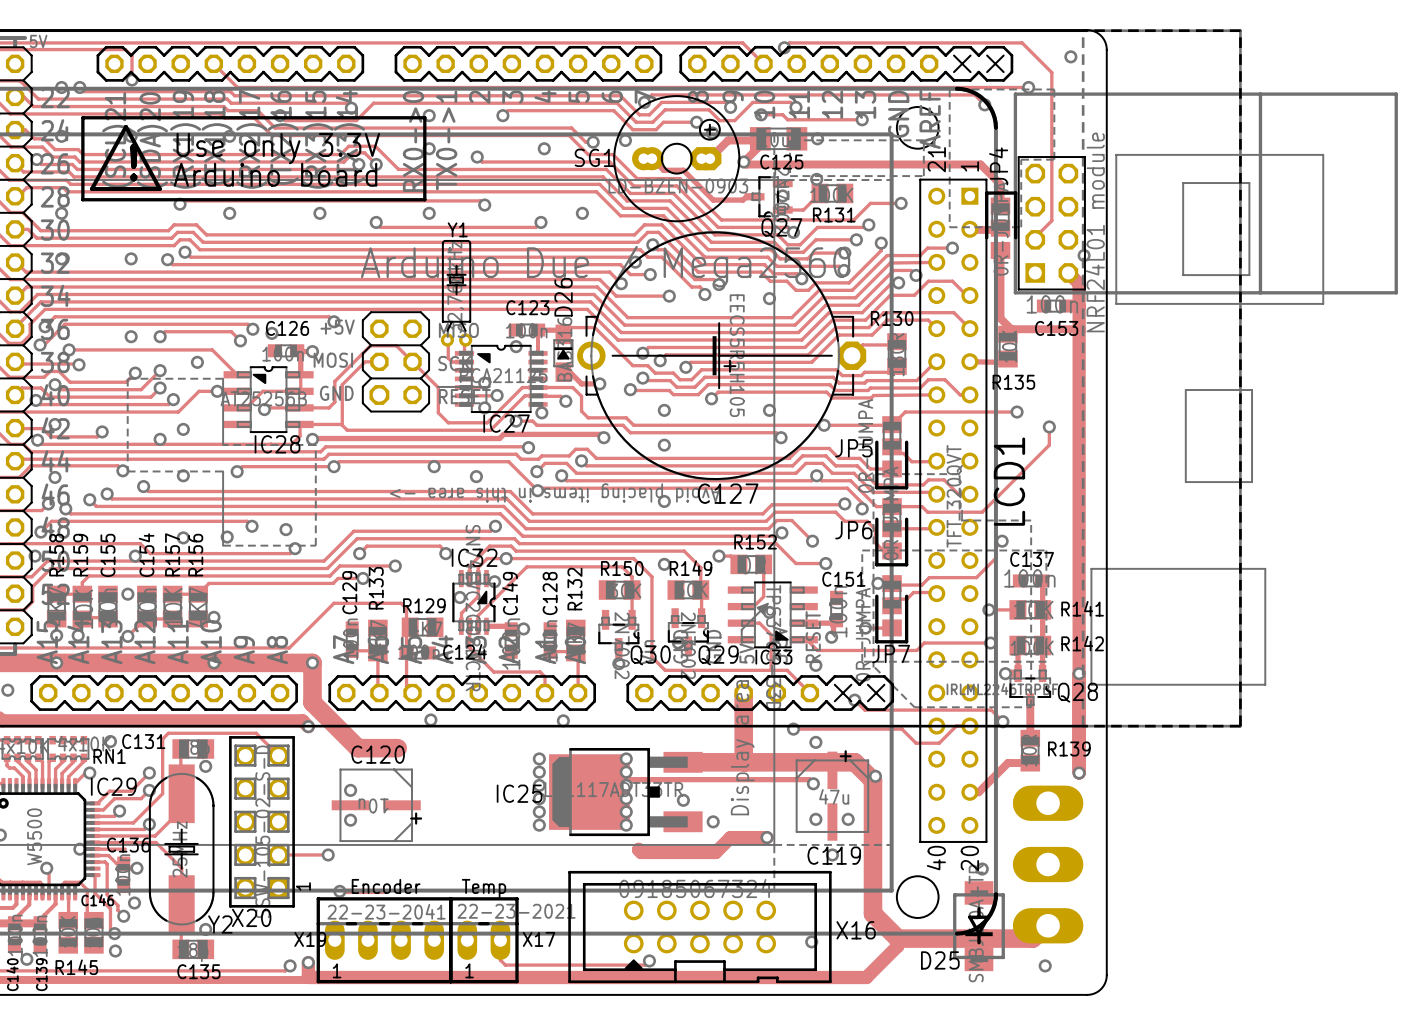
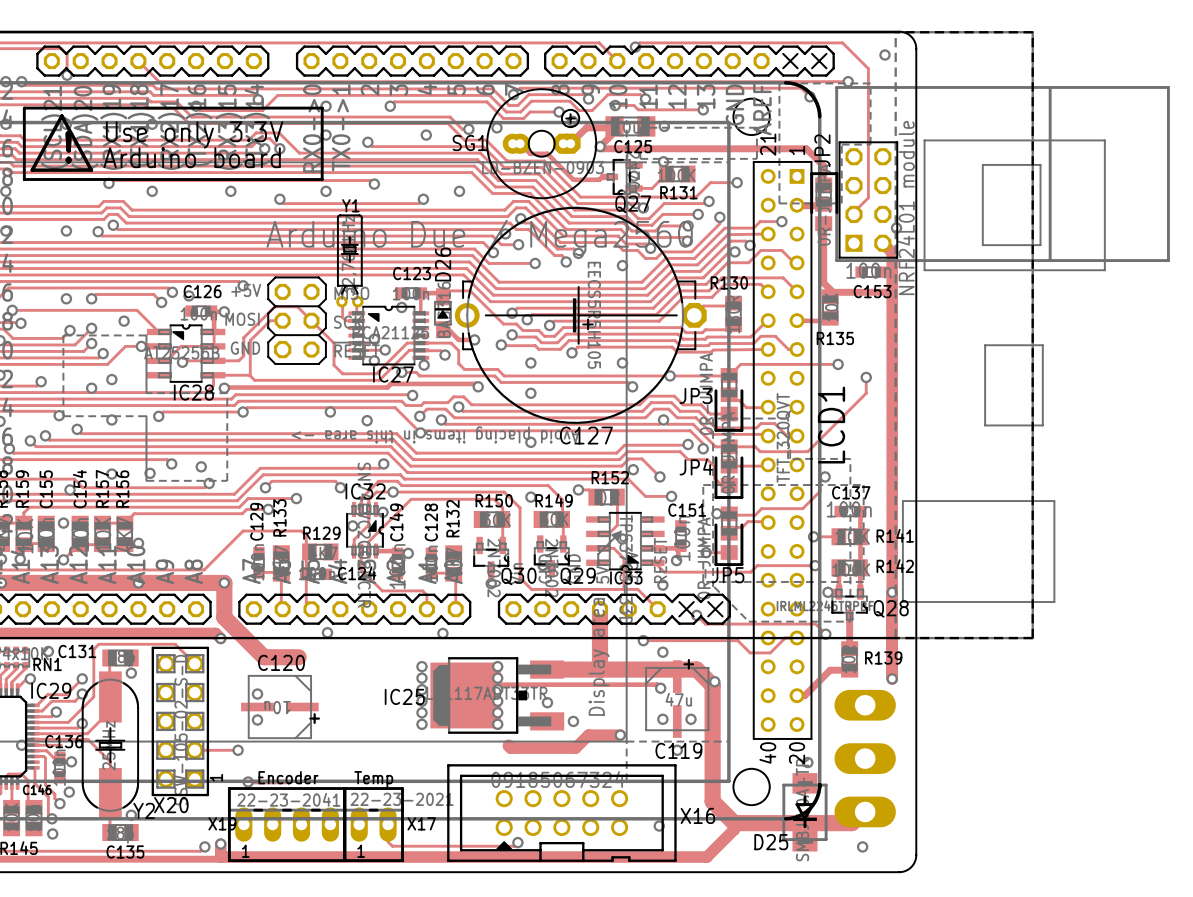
JP4 name: JP4 (998, 166) -> JP2 (822, 150)
JP5 name: JP5 (853, 448) -> JP3 (695, 396)
JP6 name: JP6 (853, 530) -> JP4 (696, 467)
JP7 name: JP7 (890, 653) -> JP5 (728, 575)

